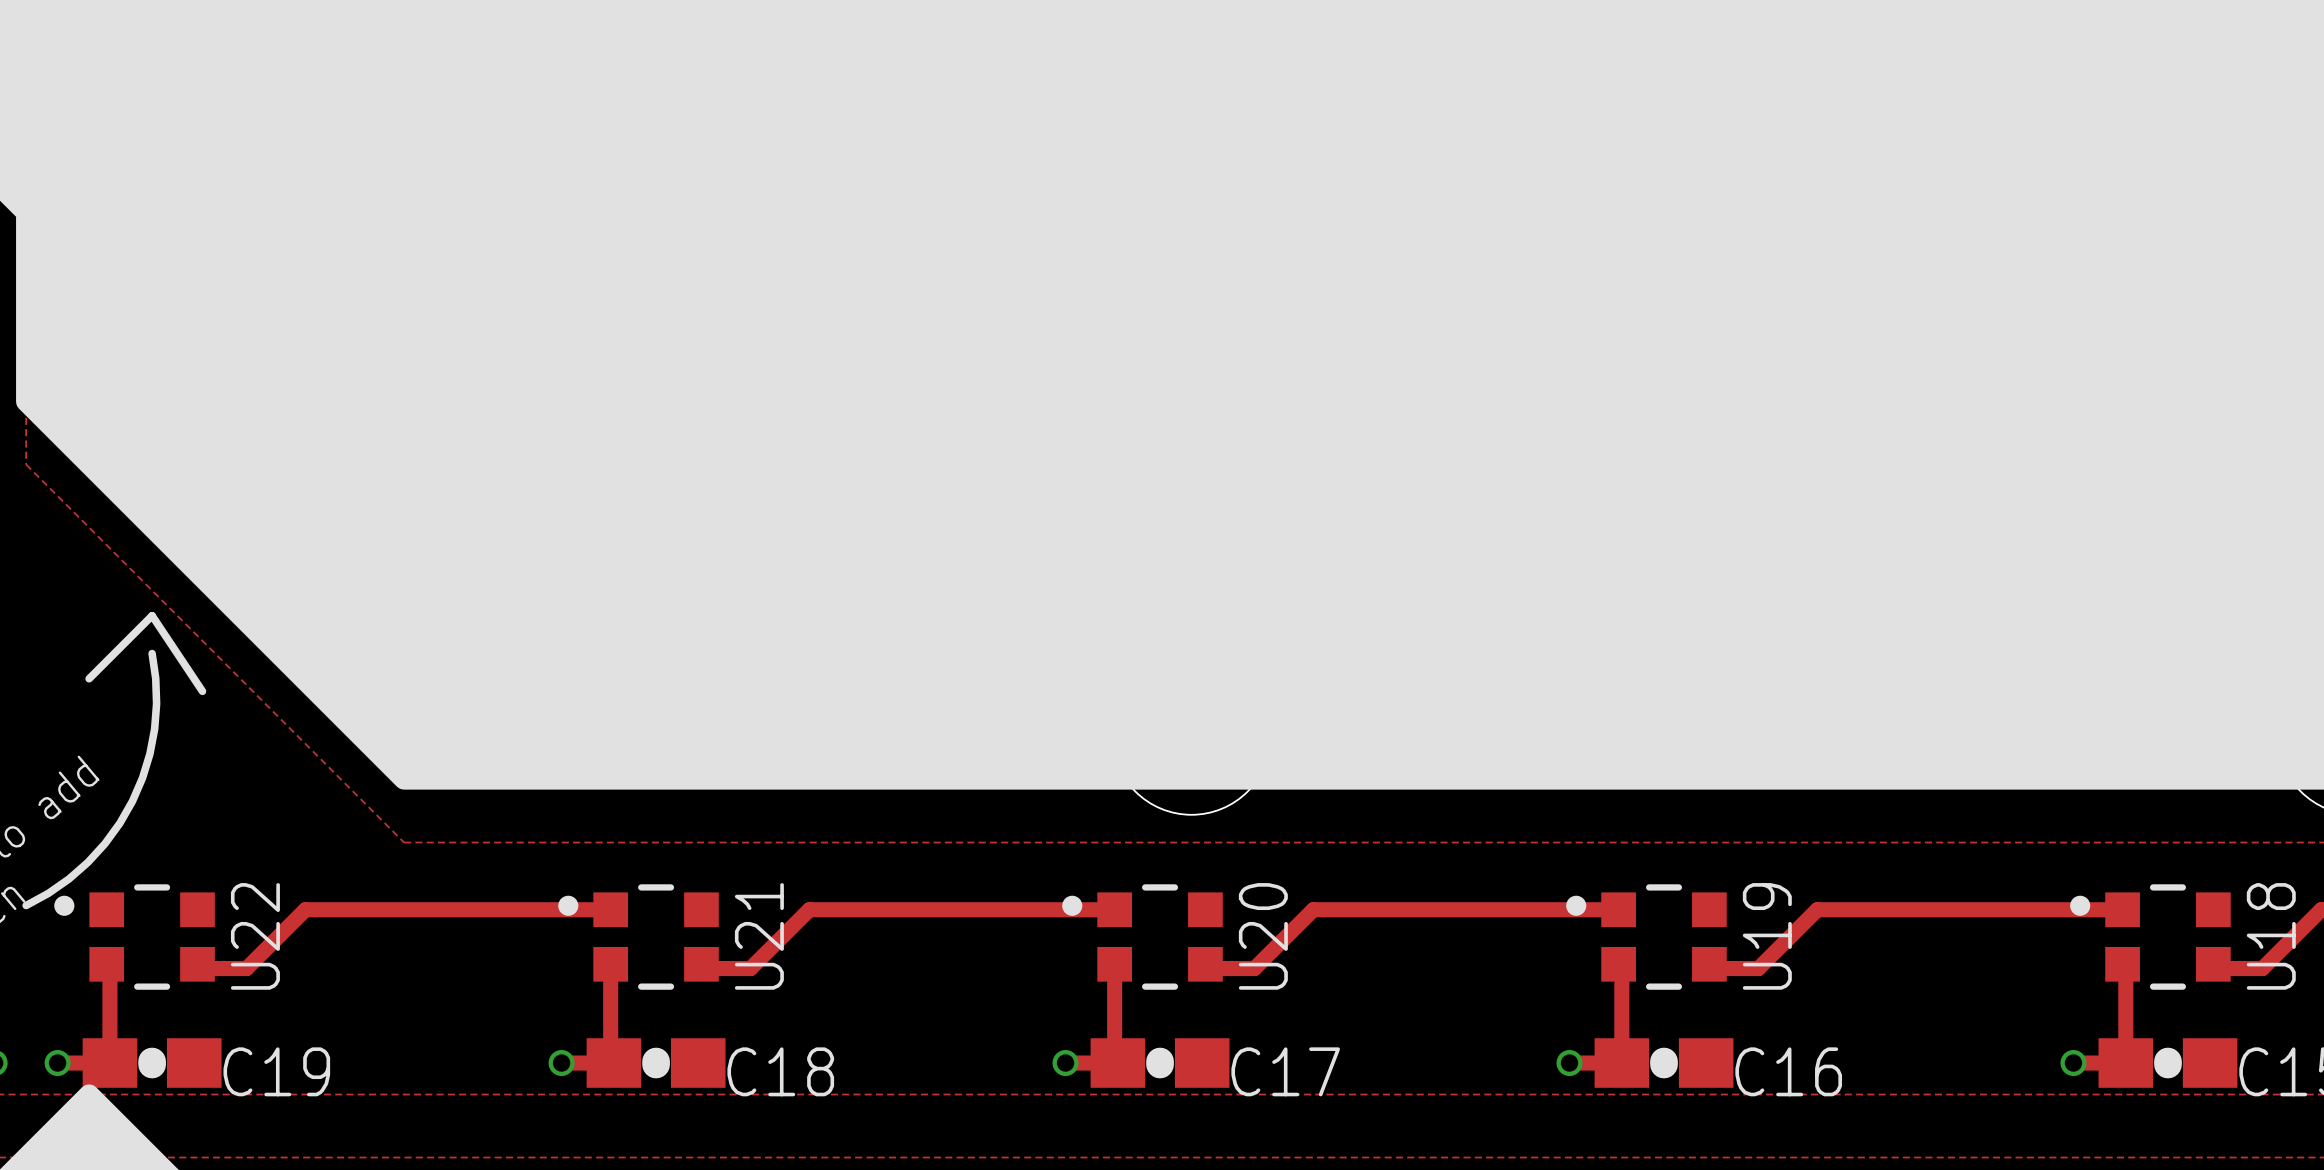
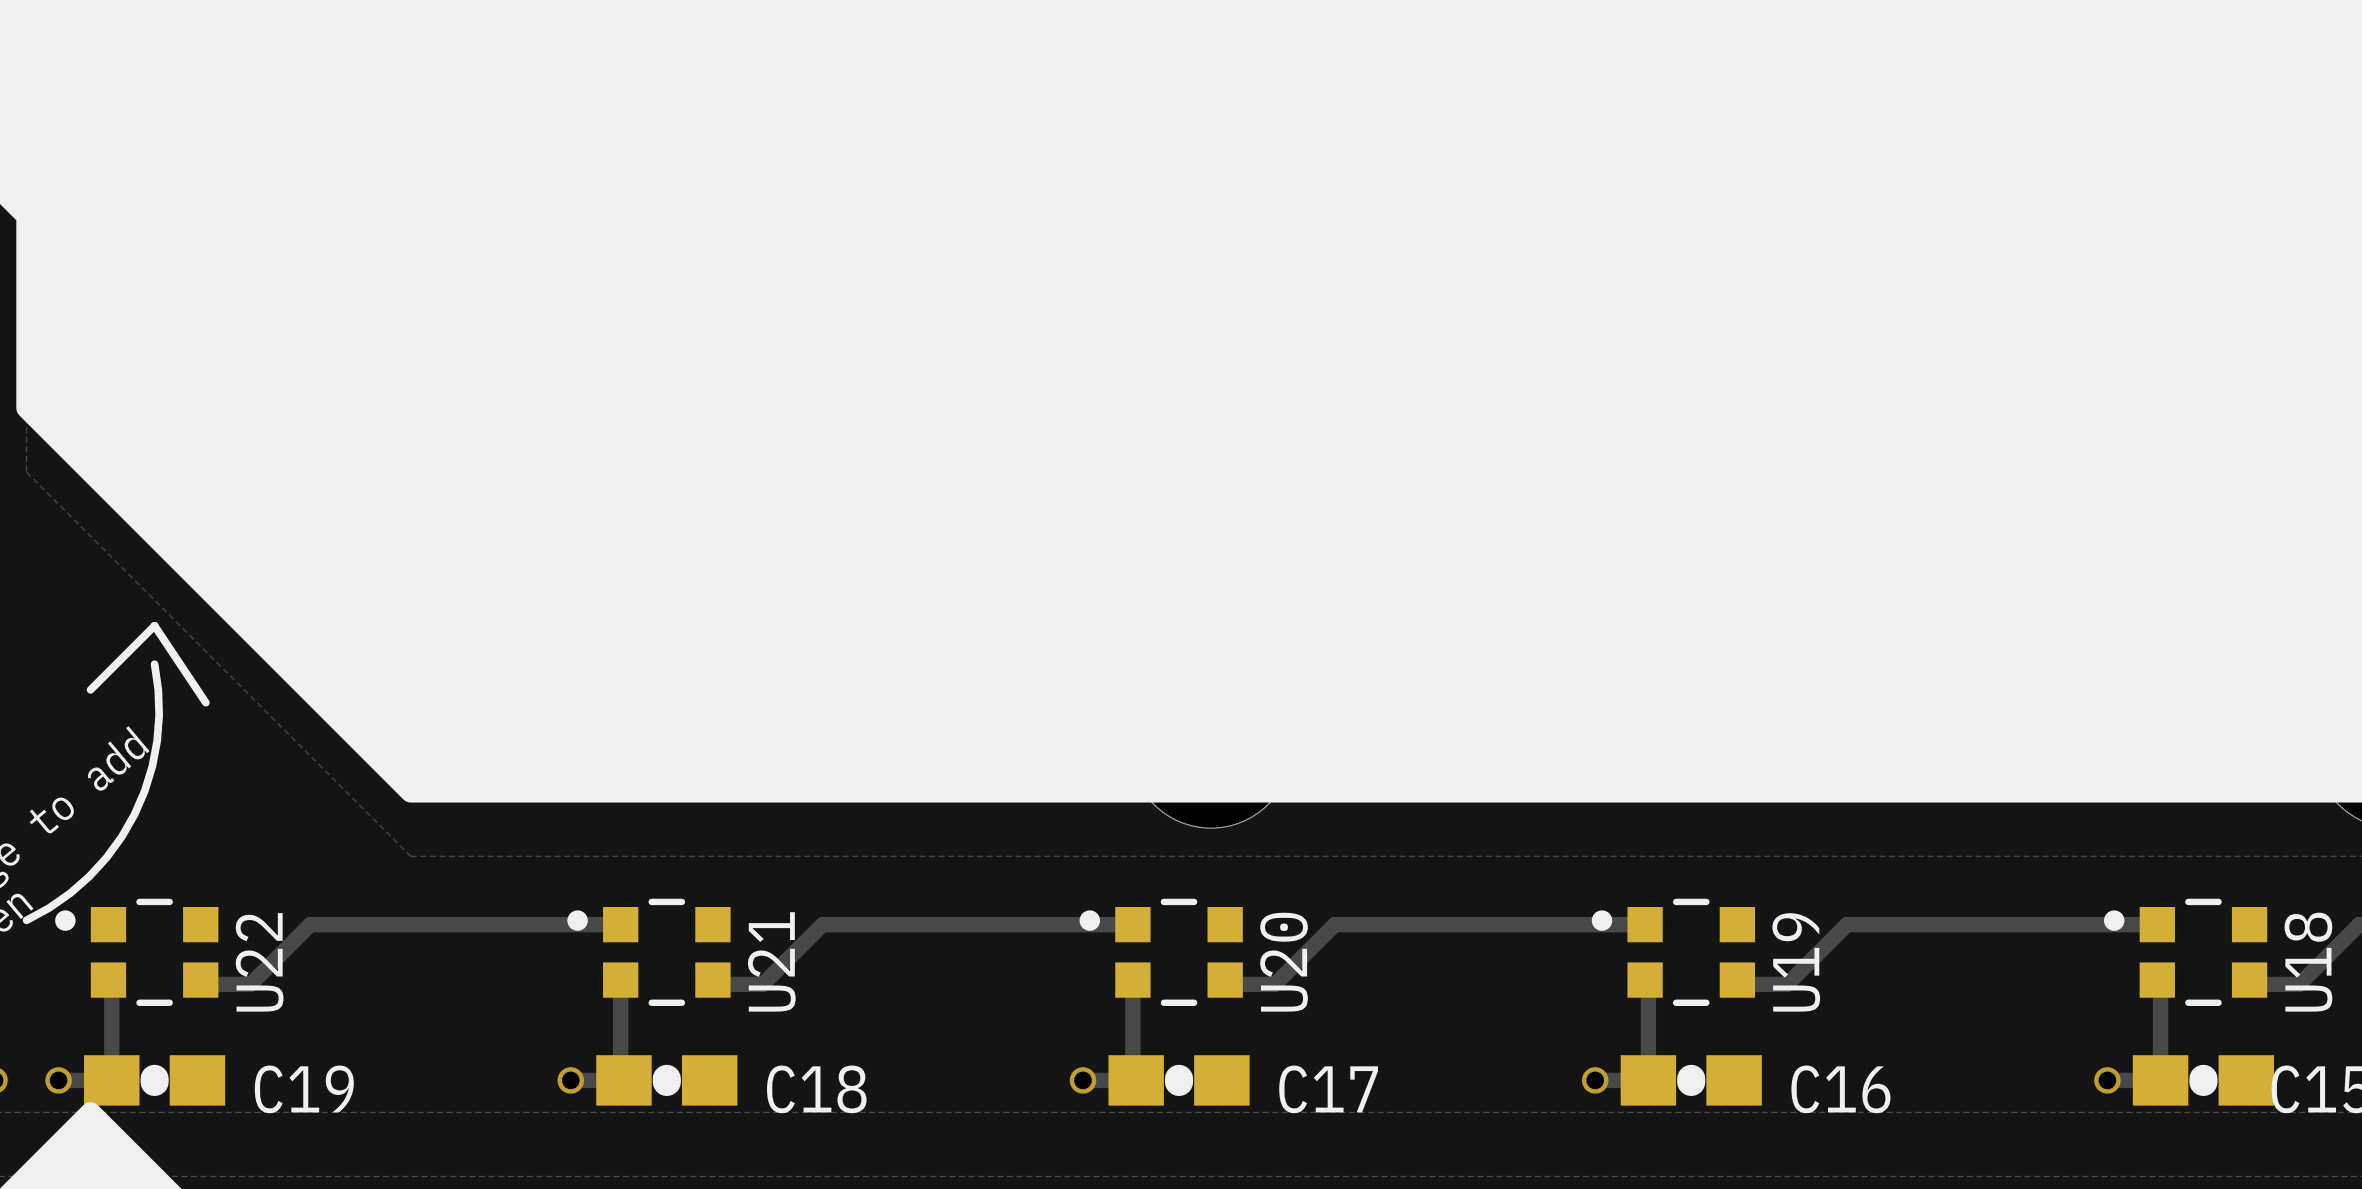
C19 name position: C19 (276, 1071) -> C19 (304, 1089)
C18 name position: C18 (780, 1071) -> C18 (816, 1089)
C17 name position: C17 (1285, 1071) -> C17 (1328, 1089)
C16 name position: C16 (1788, 1071) -> C16 (1840, 1089)

